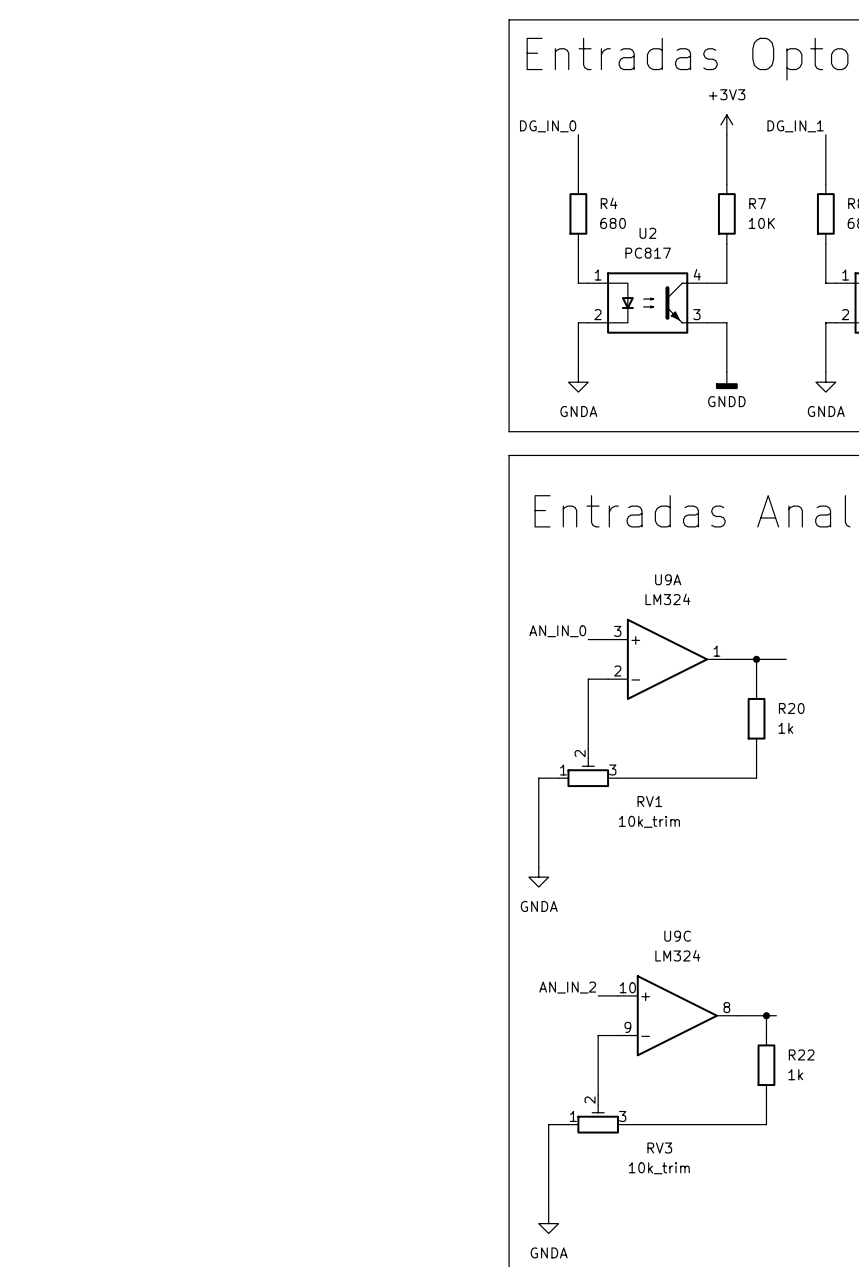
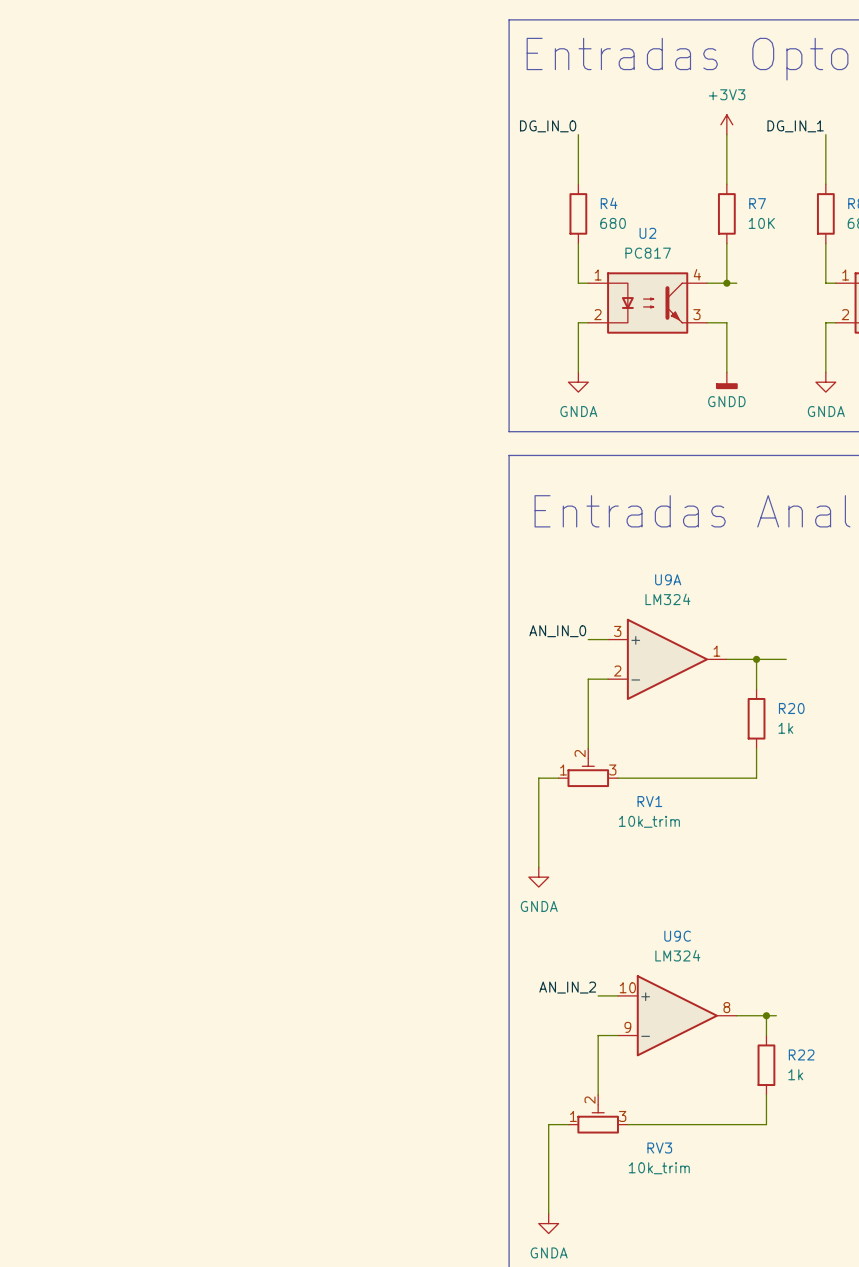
wire: none -> (726, 283) (736, 283)
junction: none -> (726, 283)

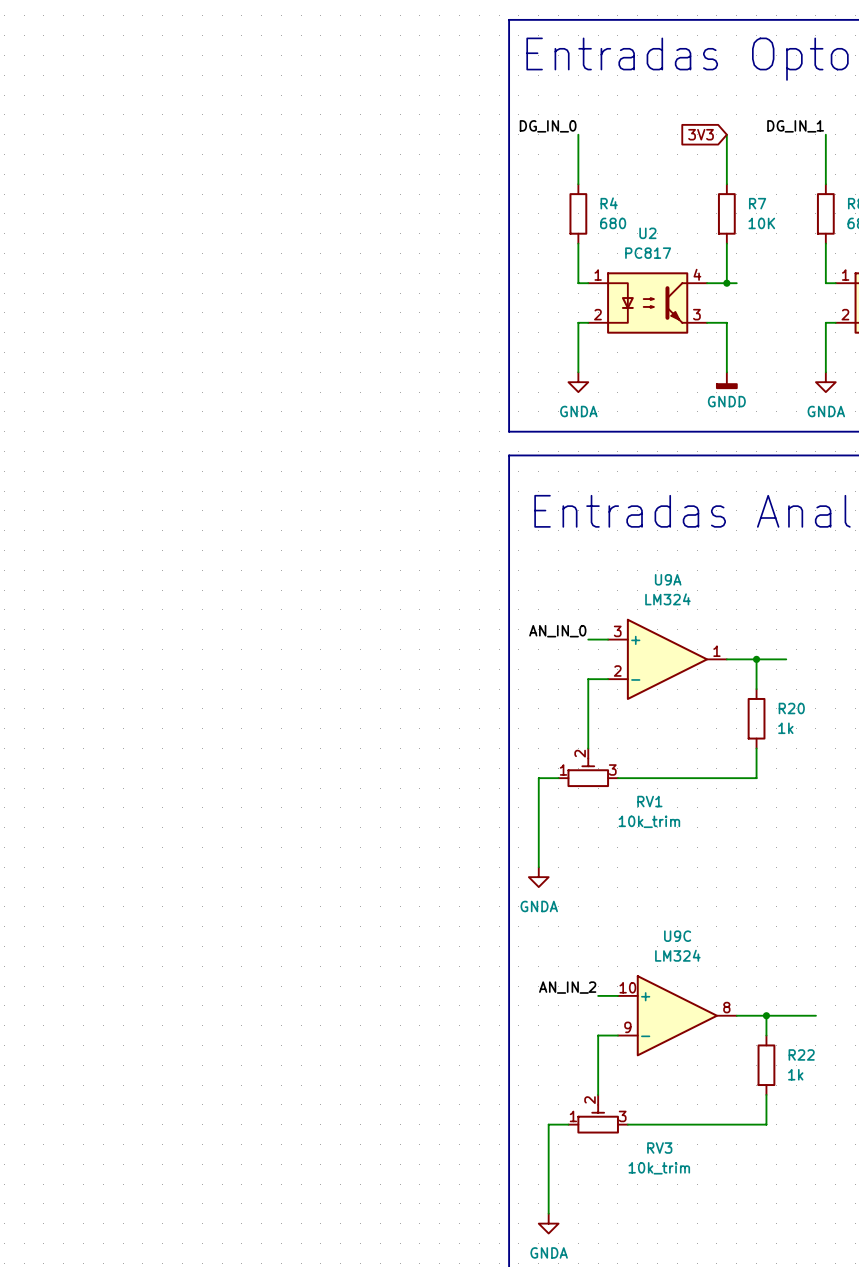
power symbol: +3V3 (726, 124) -> none
global label: none -> 3V3 (701, 134)
wire: none -> (776, 1015) (815, 1015)

